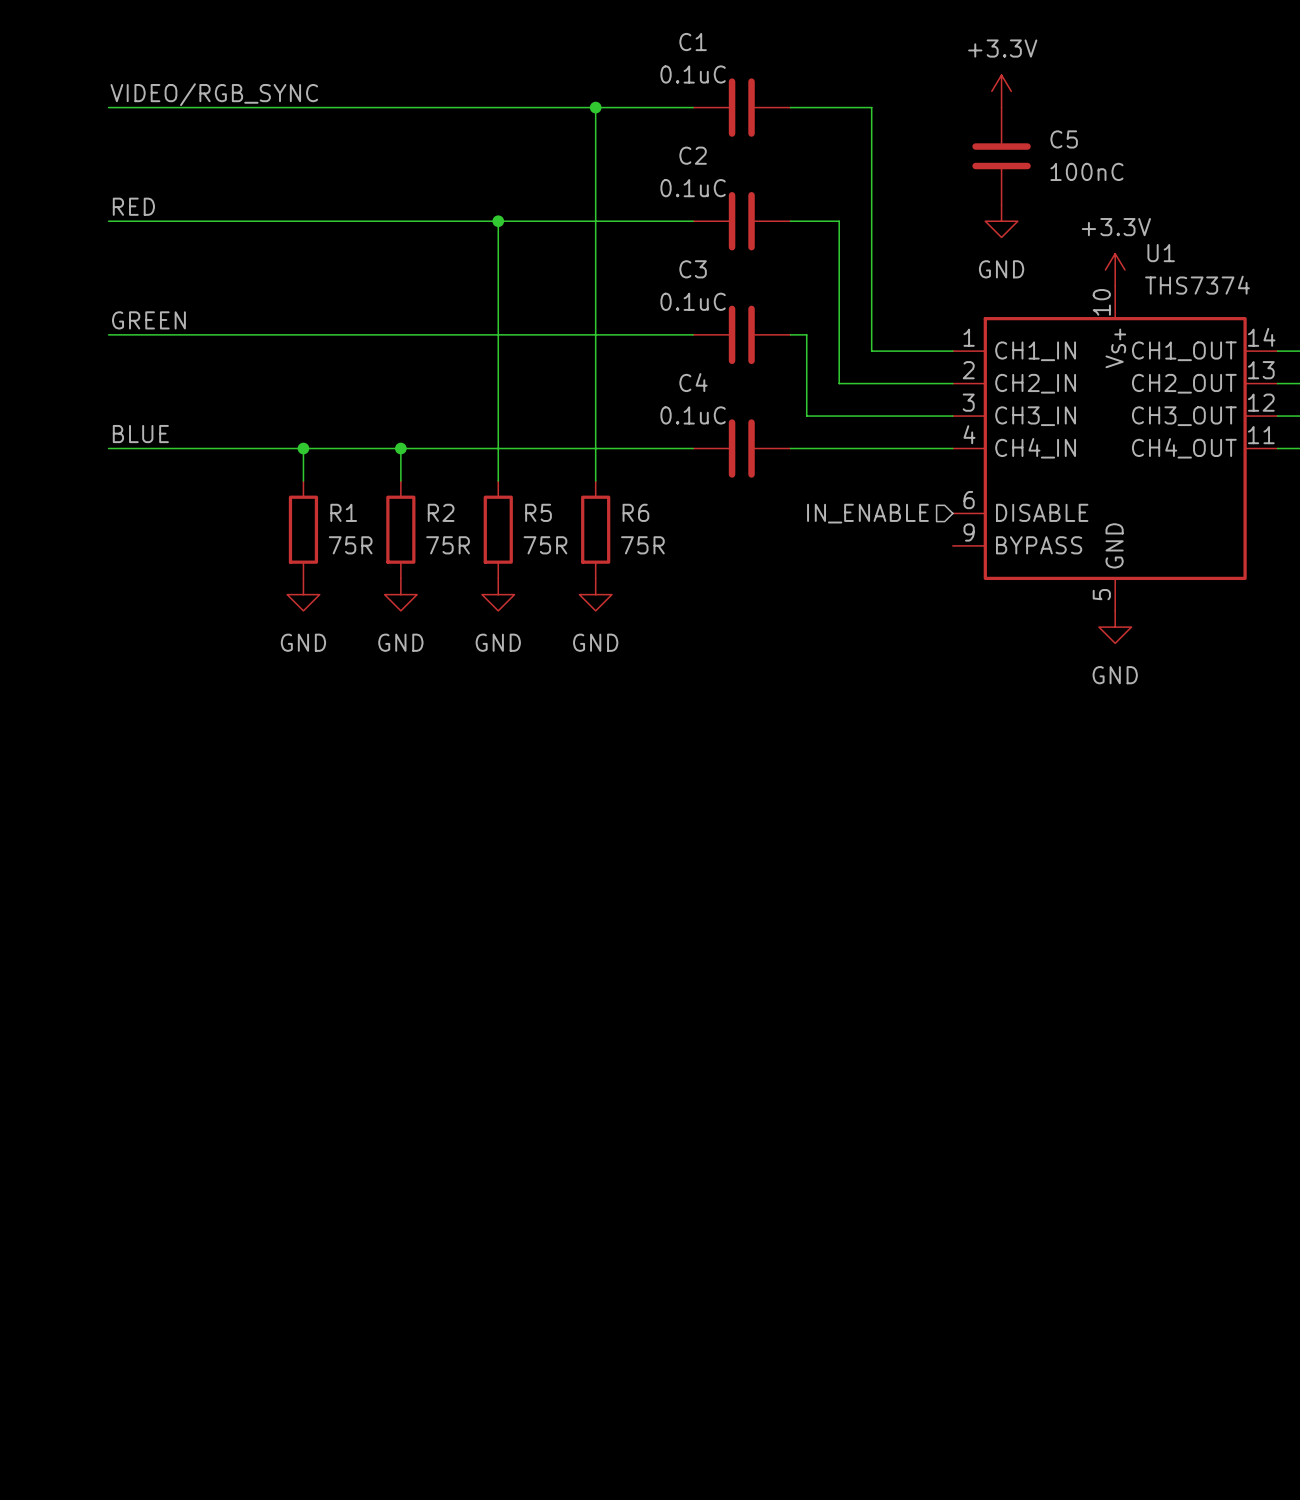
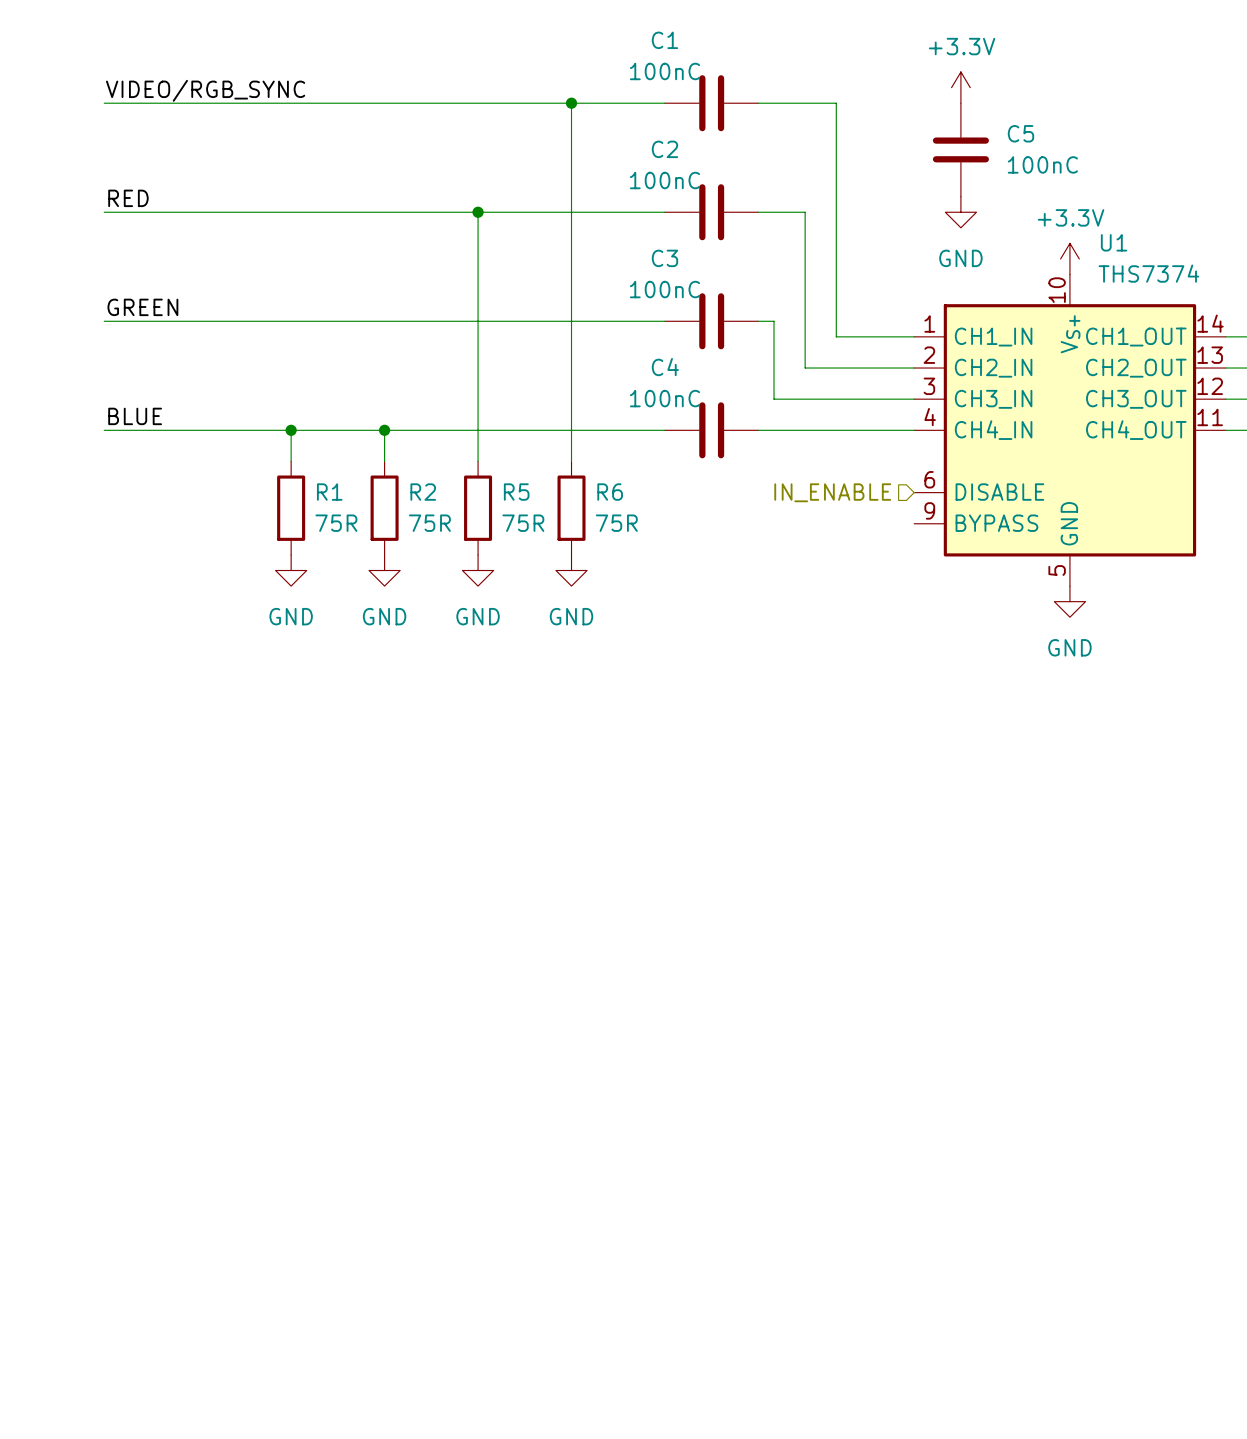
C1 value: 0.1uC (693, 74) -> 100nC (664, 71)
C2 value: 0.1uC (693, 188) -> 100nC (664, 180)
C3 value: 0.1uC (693, 301) -> 100nC (664, 289)
C4 value: 0.1uC (693, 415) -> 100nC (664, 398)

